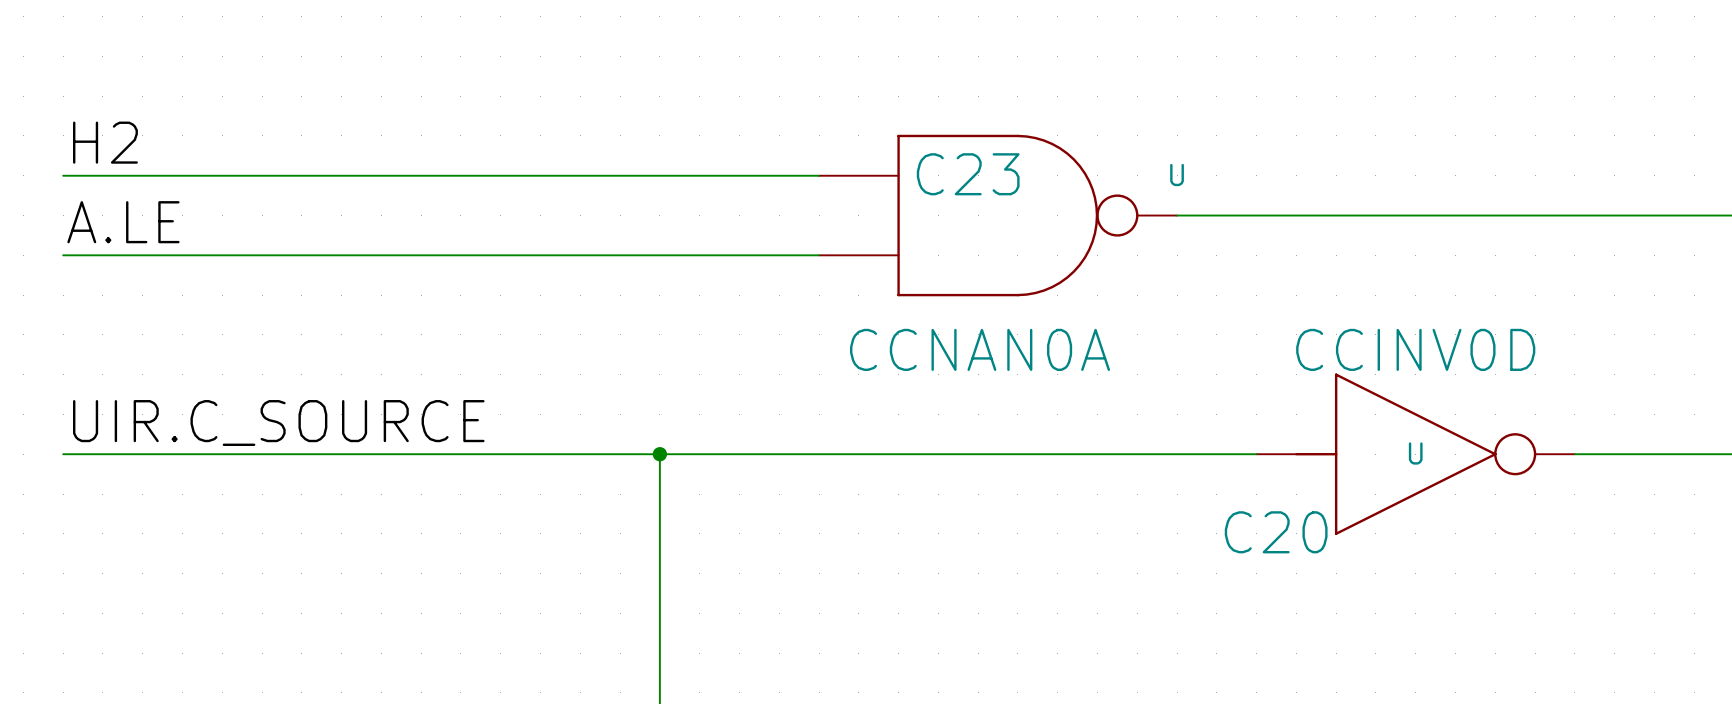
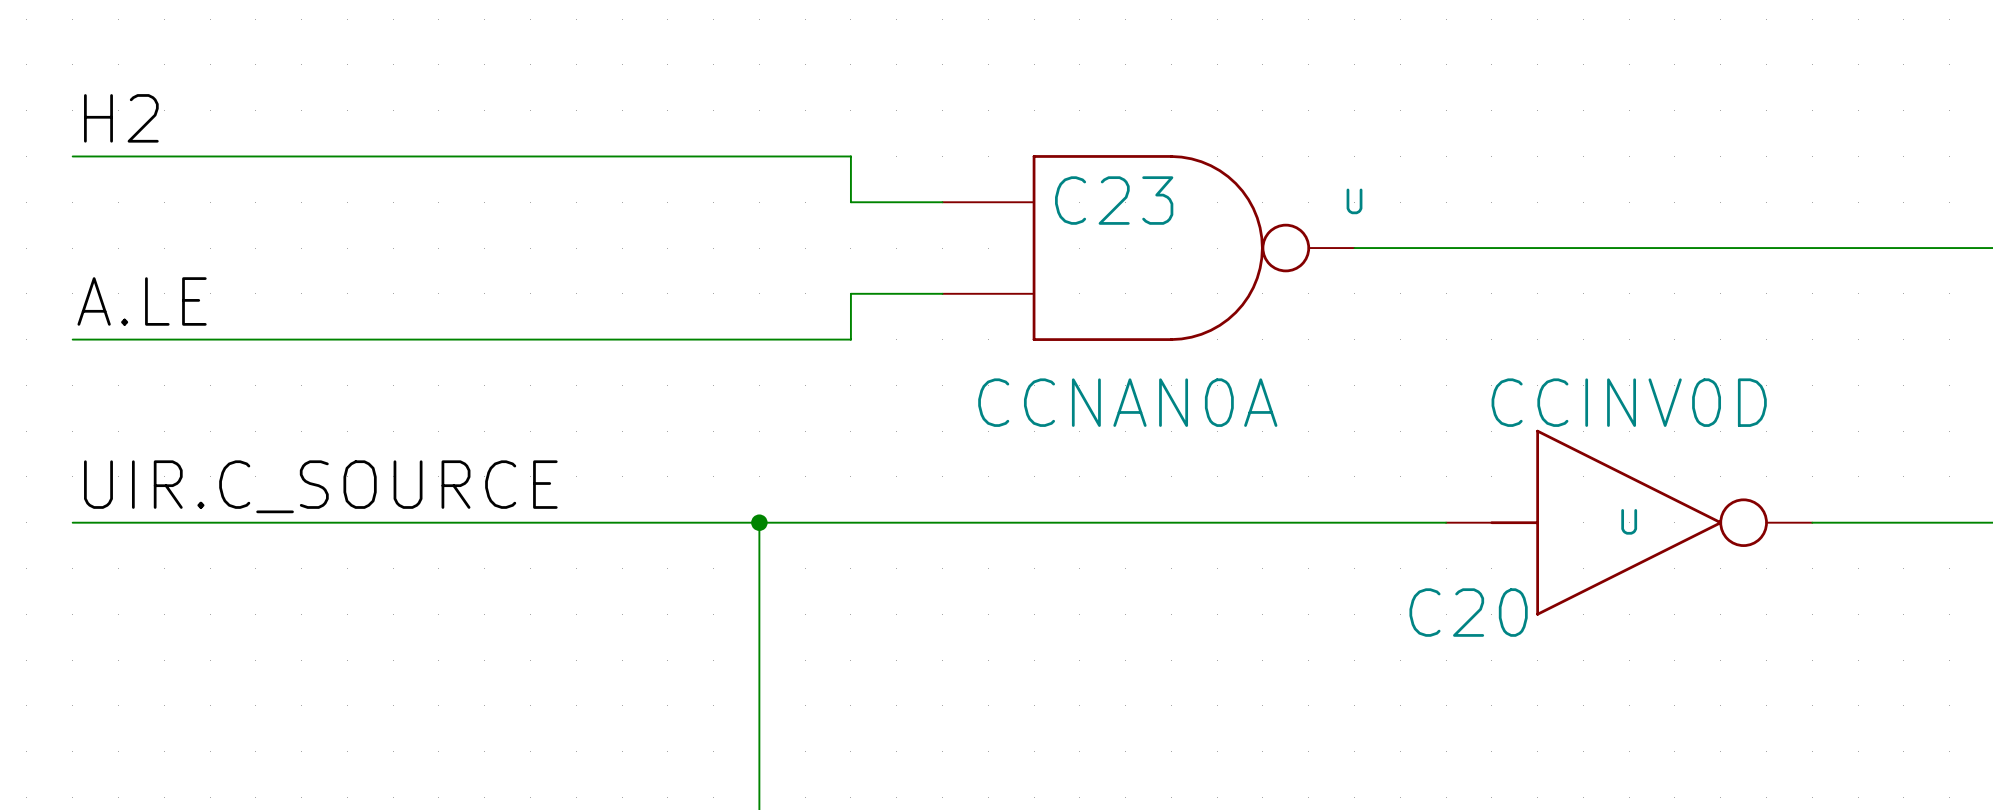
label position: H2 (105, 142) -> H2 (121, 118)
wire: (63, 175) (739, 175) -> (72, 156) (850, 156) (850, 202)
label position: A.LE (123, 222) -> A.LE (142, 301)
wire: (63, 255) (739, 255) -> (72, 339) (850, 339) (850, 293)

